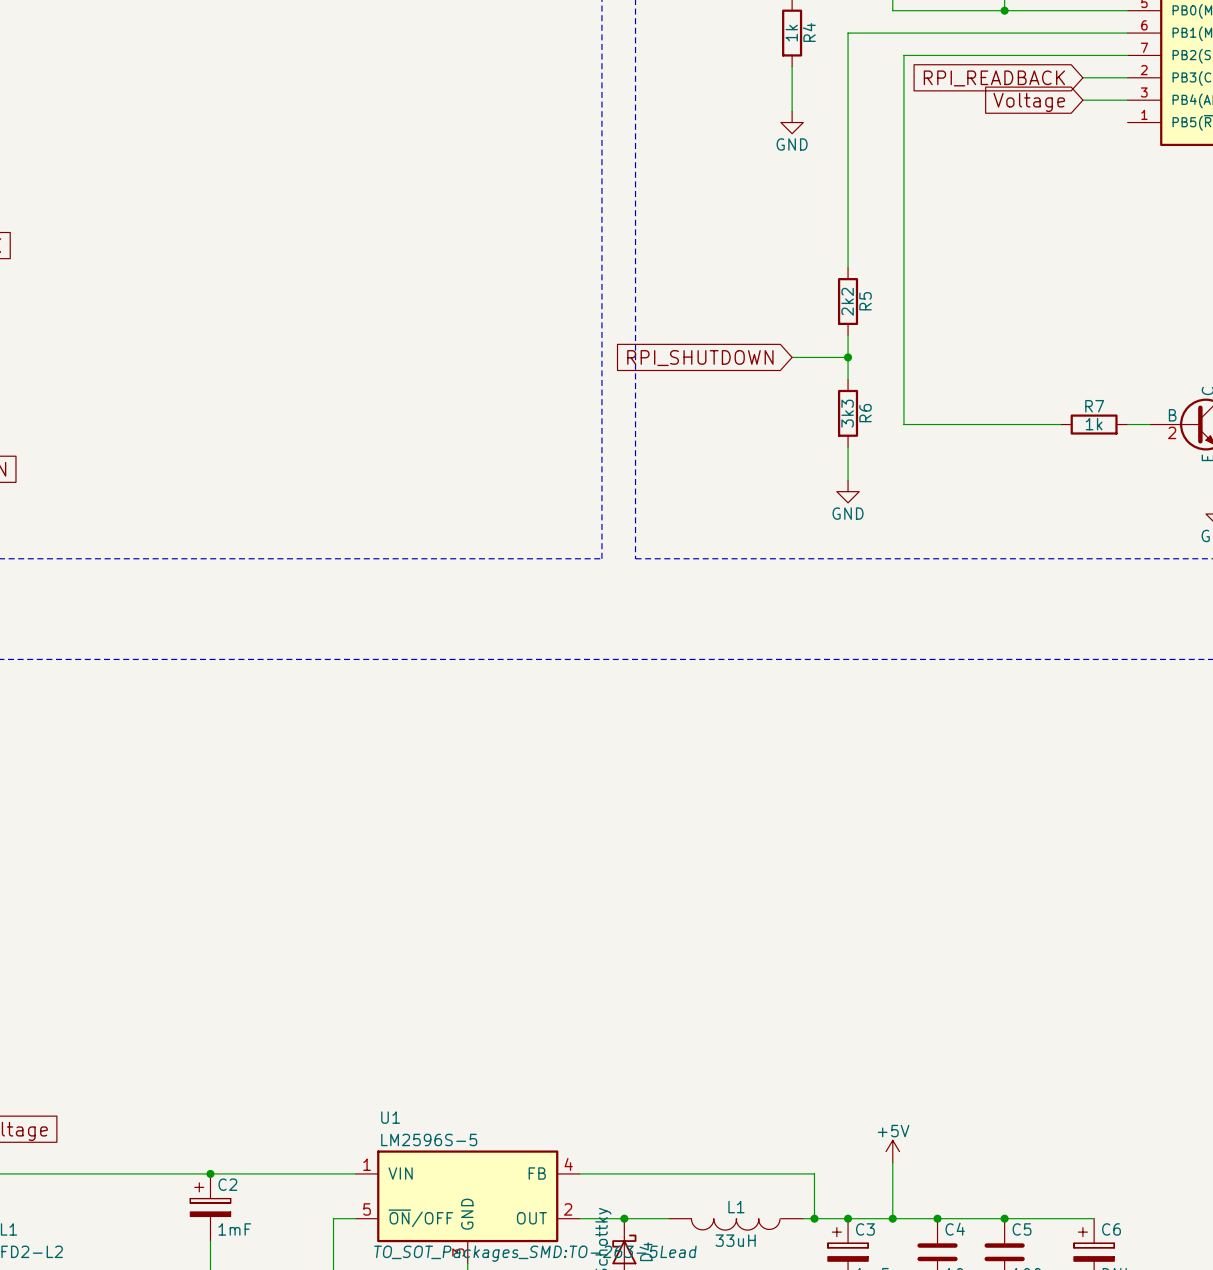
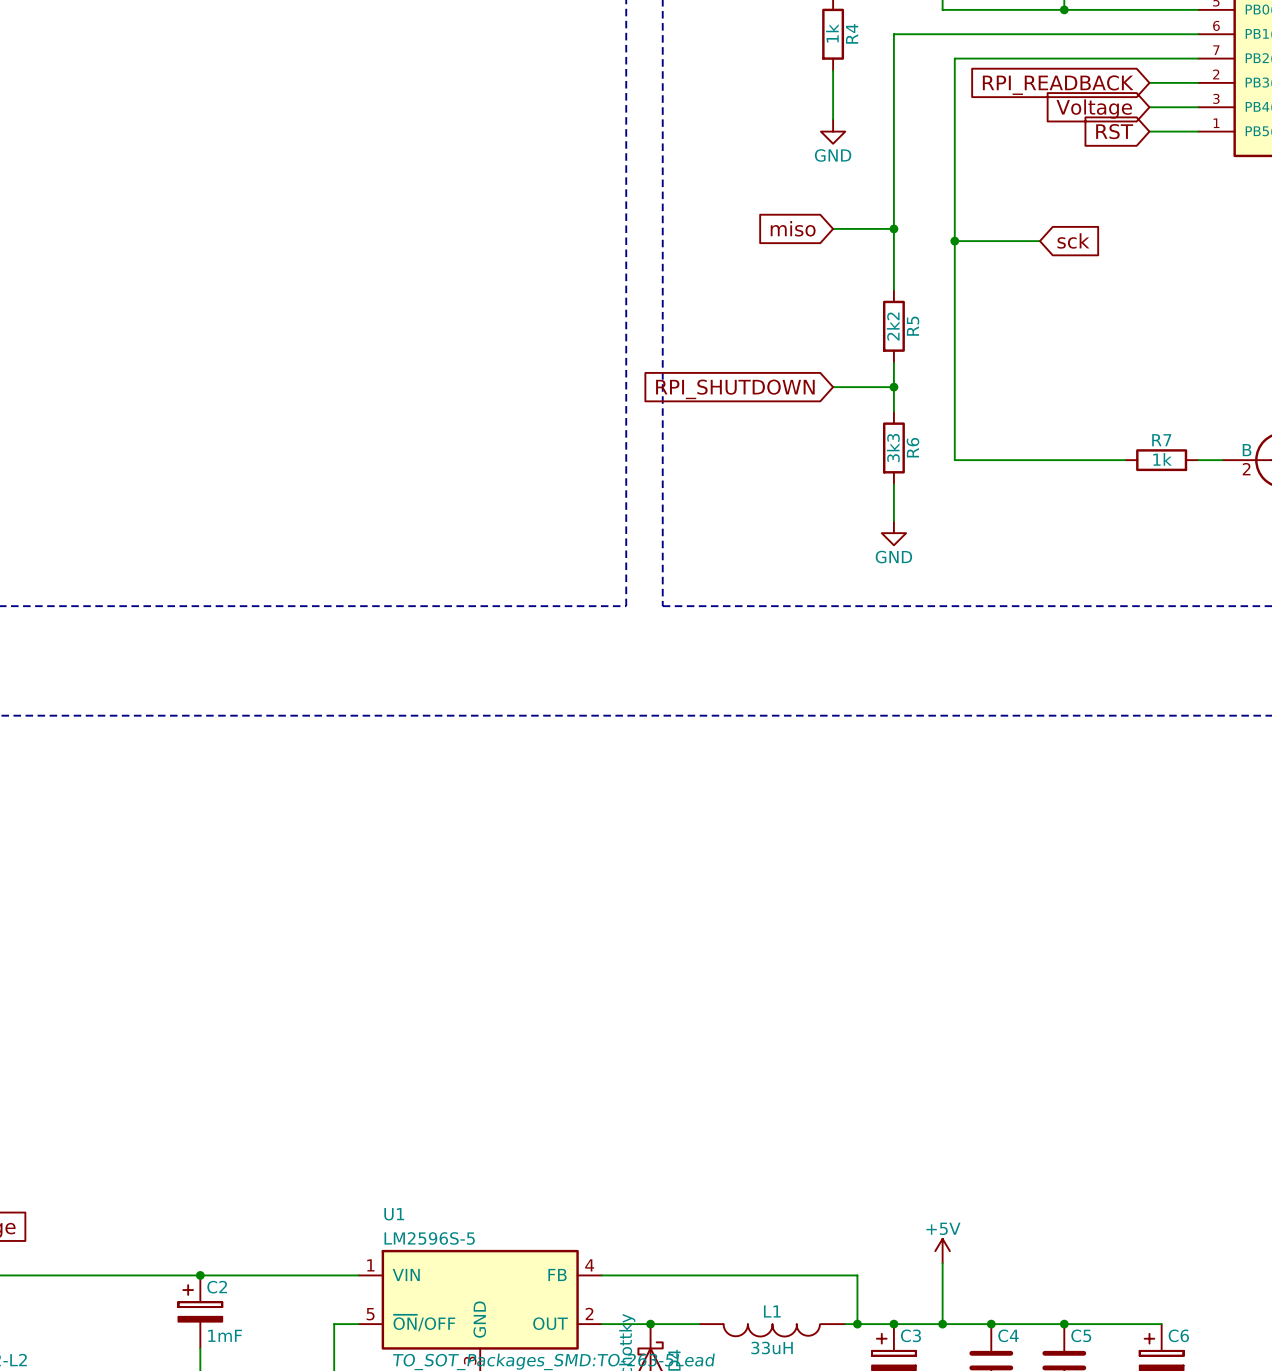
global label: none -> RST (1114, 131)
wire: none -> (1149, 131) (1198, 131)
global label: none -> miso (793, 228)
wire: none -> (833, 228) (893, 228)
junction: none -> (893, 228)
wire: none -> (954, 241) (1039, 241)
junction: none -> (954, 241)
global label: none -> sck (1073, 240)

